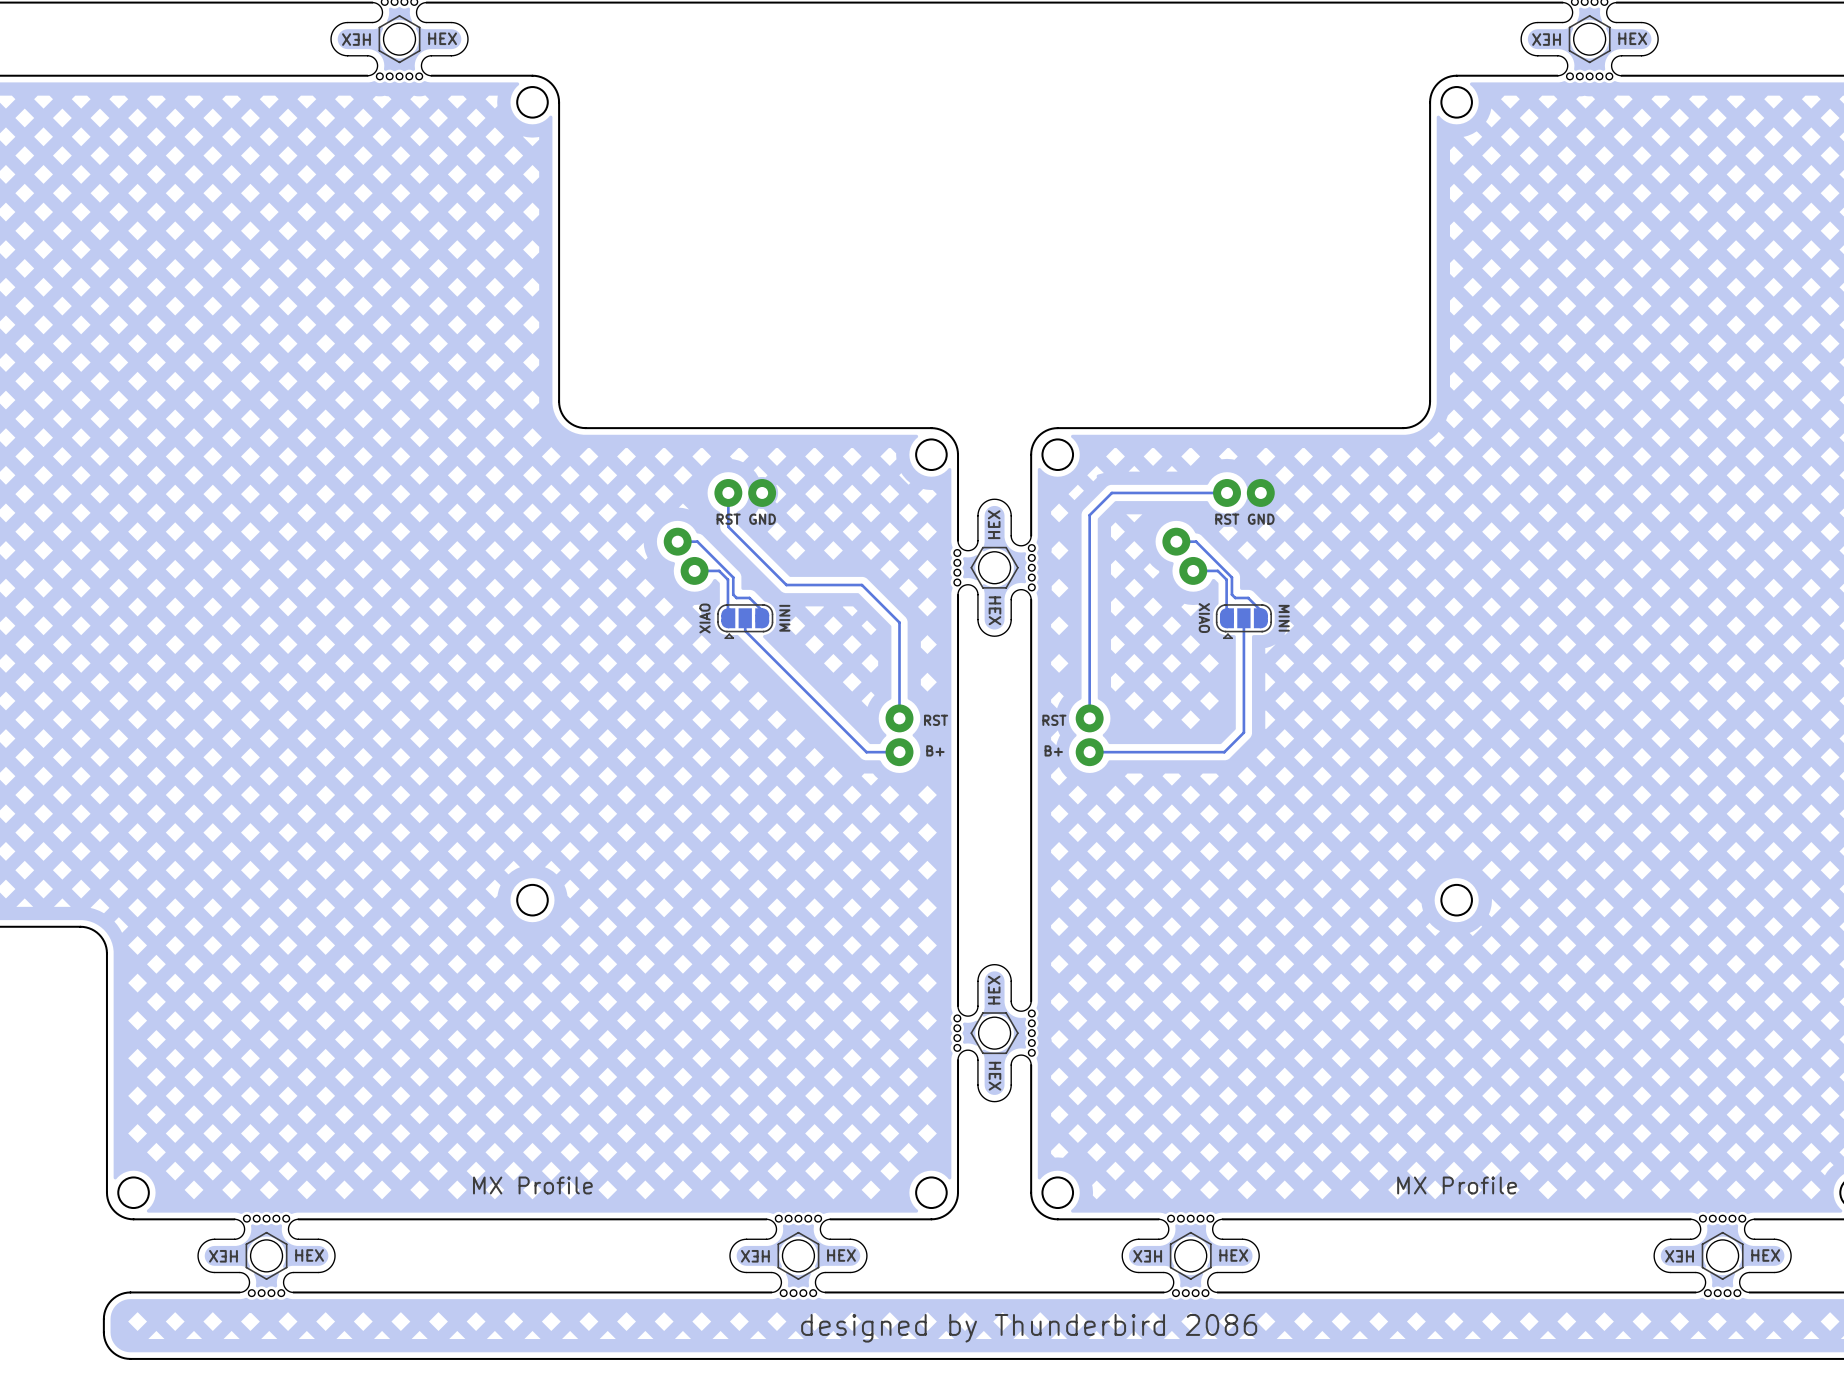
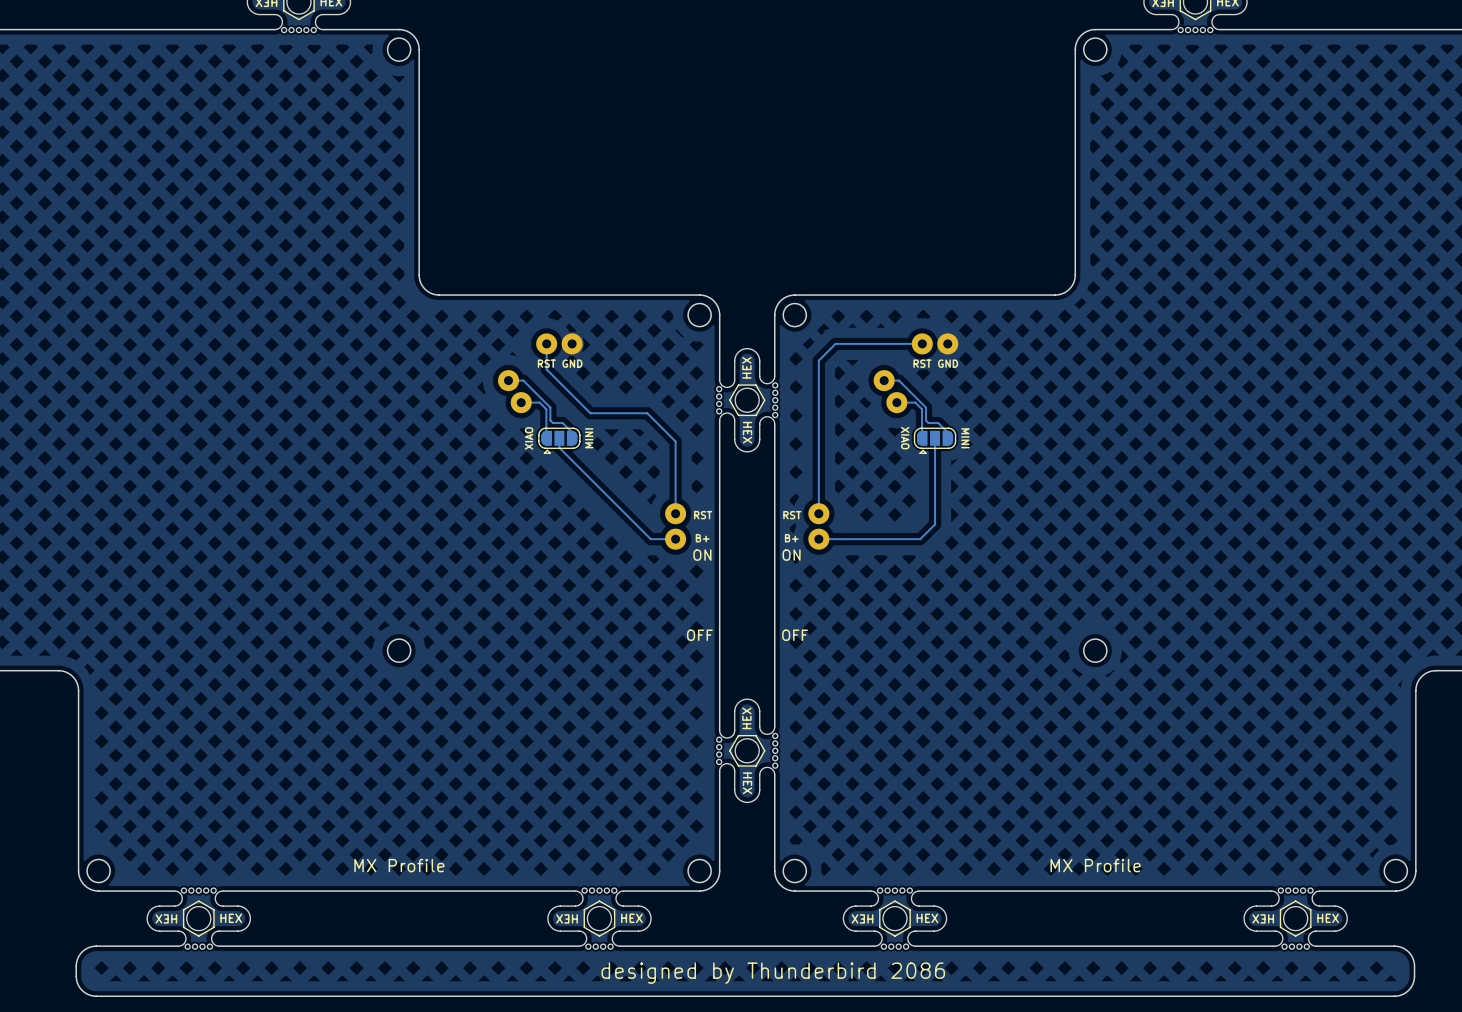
text: none -> ON (702, 555)
text: none -> ON (791, 555)
text: none -> OFF (699, 635)
text: none -> OFF (795, 635)

